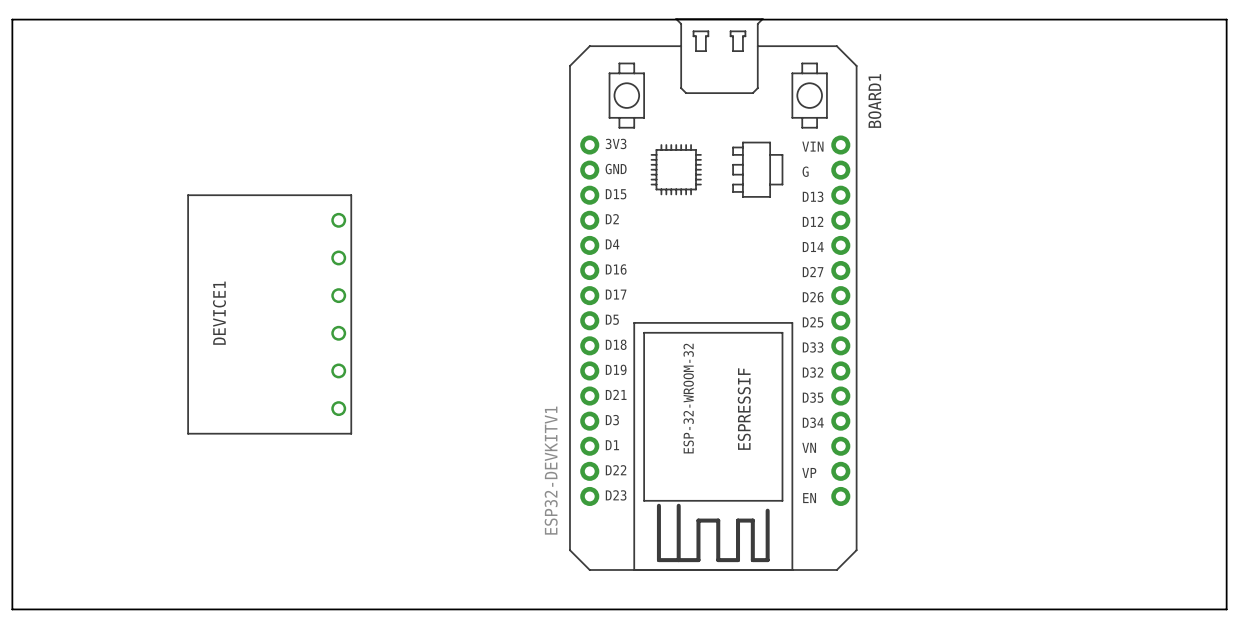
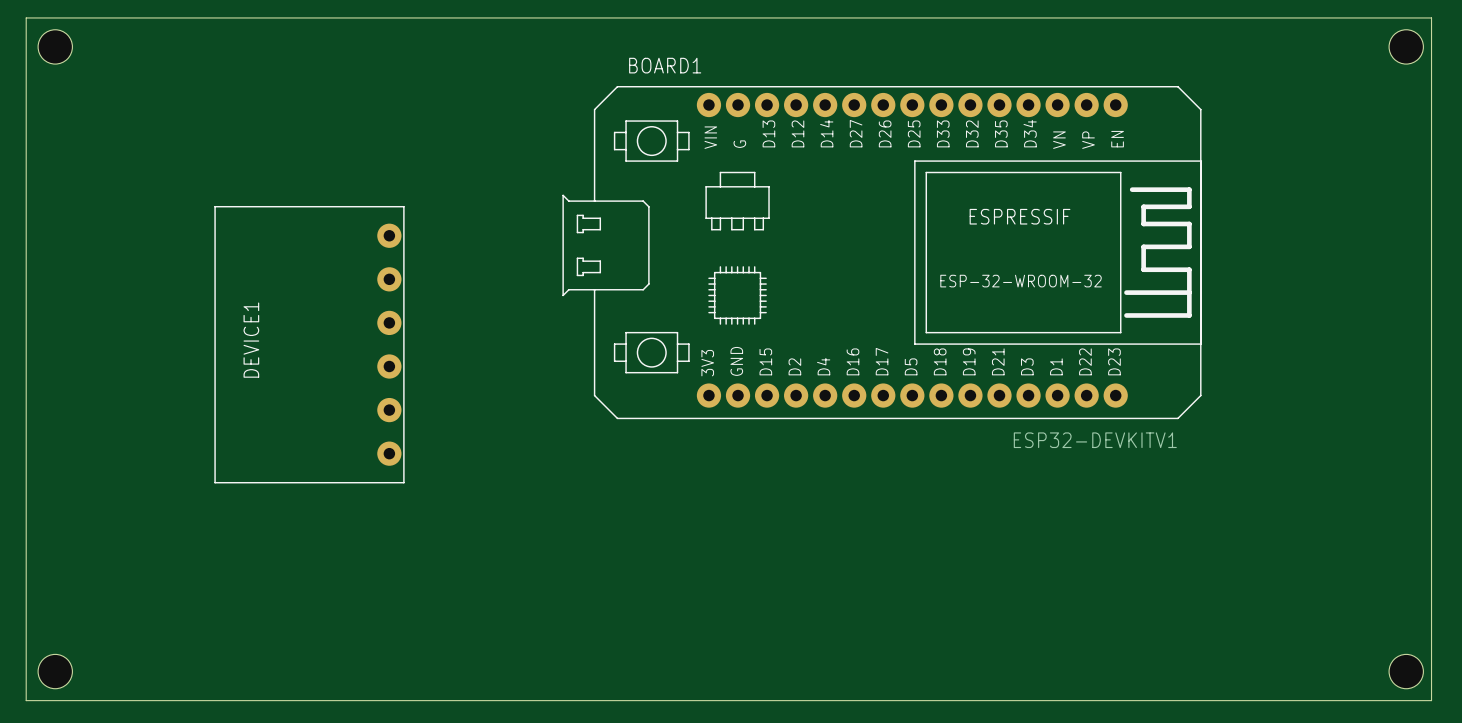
BOARD1 footprint: [569, 18, 858, 571] -> [562, 85, 1202, 420]
hole: none -> (55, 46)
hole: none -> (1406, 46)
BOARD1 name position: BOARD1 (874, 101) -> BOARD1 (665, 65)
part: none -> (309, 344)
part: (269, 314) -> none
hole: none -> (55, 671)
hole: none -> (1406, 671)

